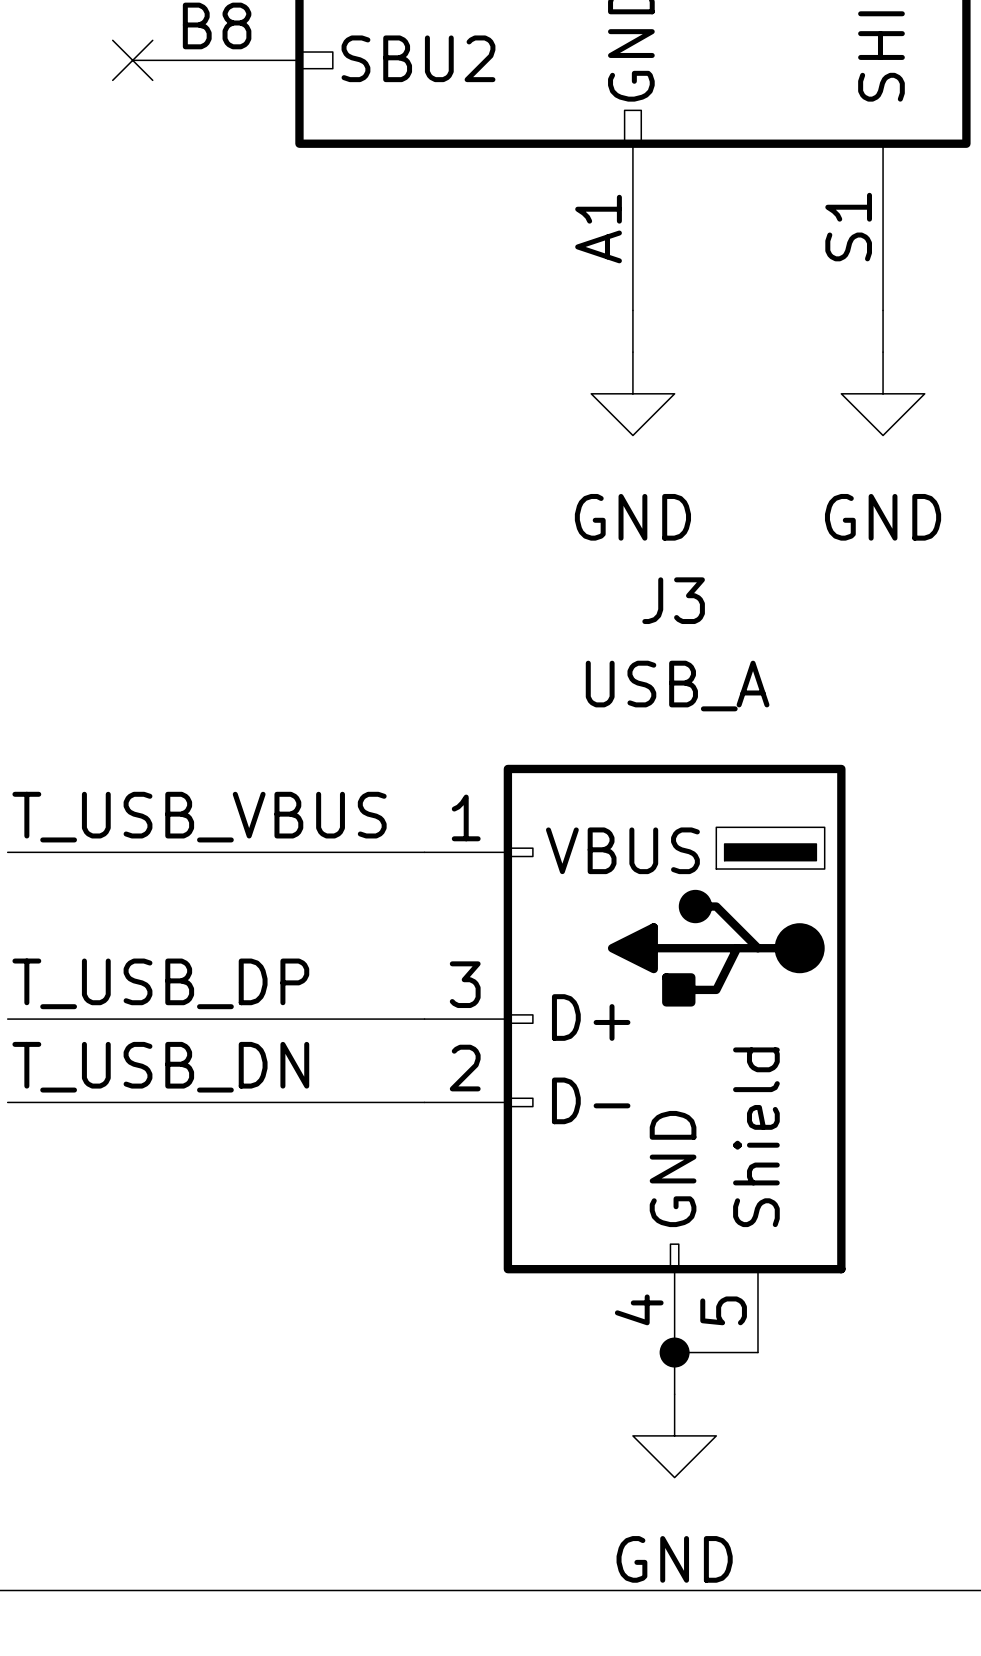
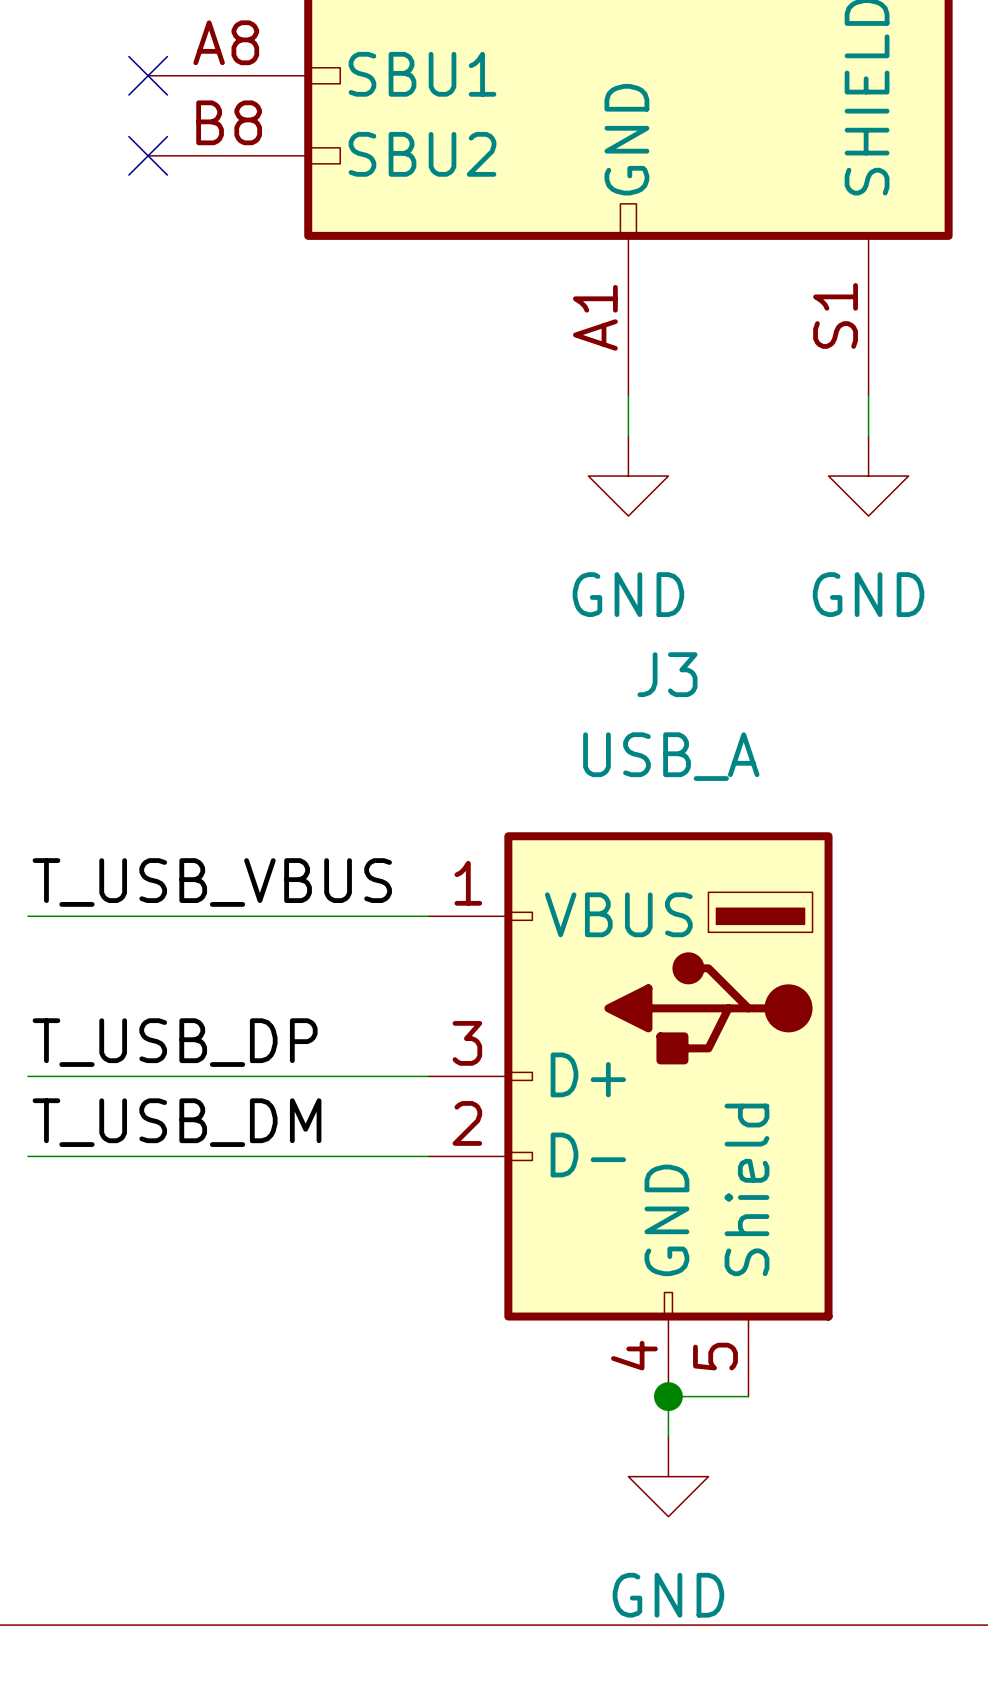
label: T_USB_DN (160, 1067) -> T_USB_DM (177, 1122)

